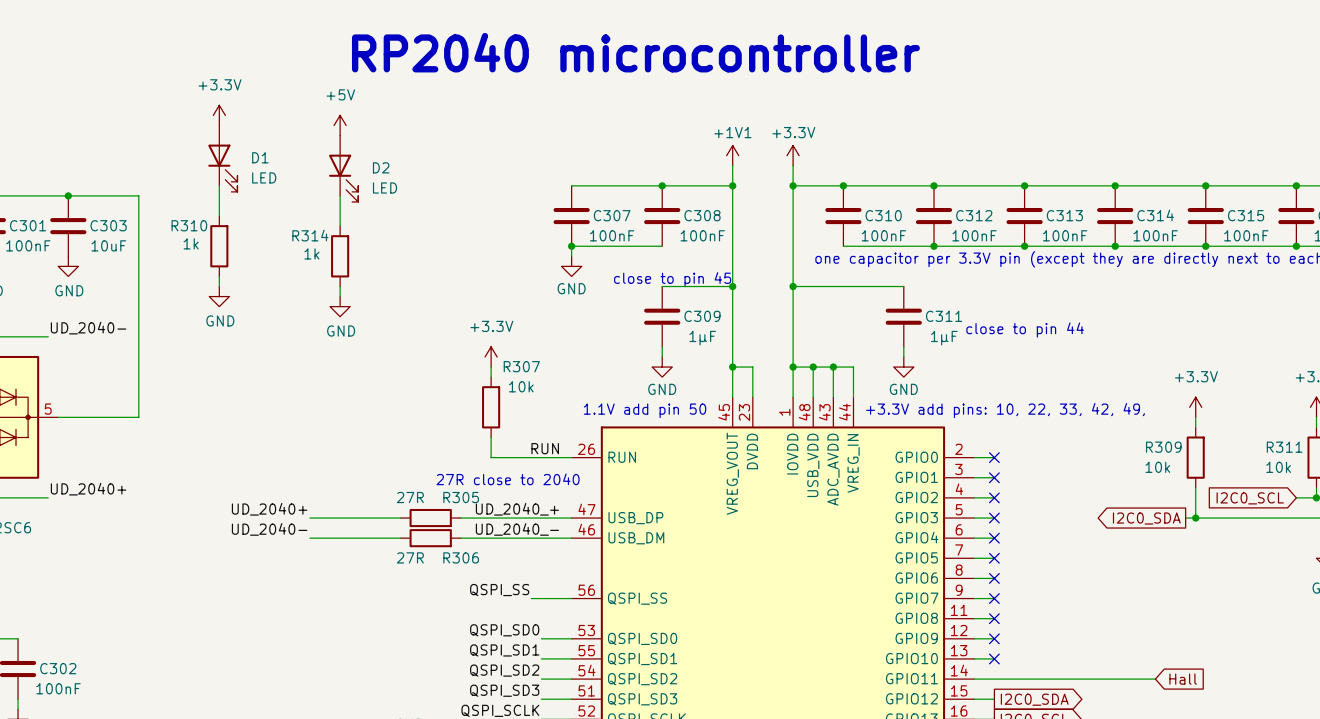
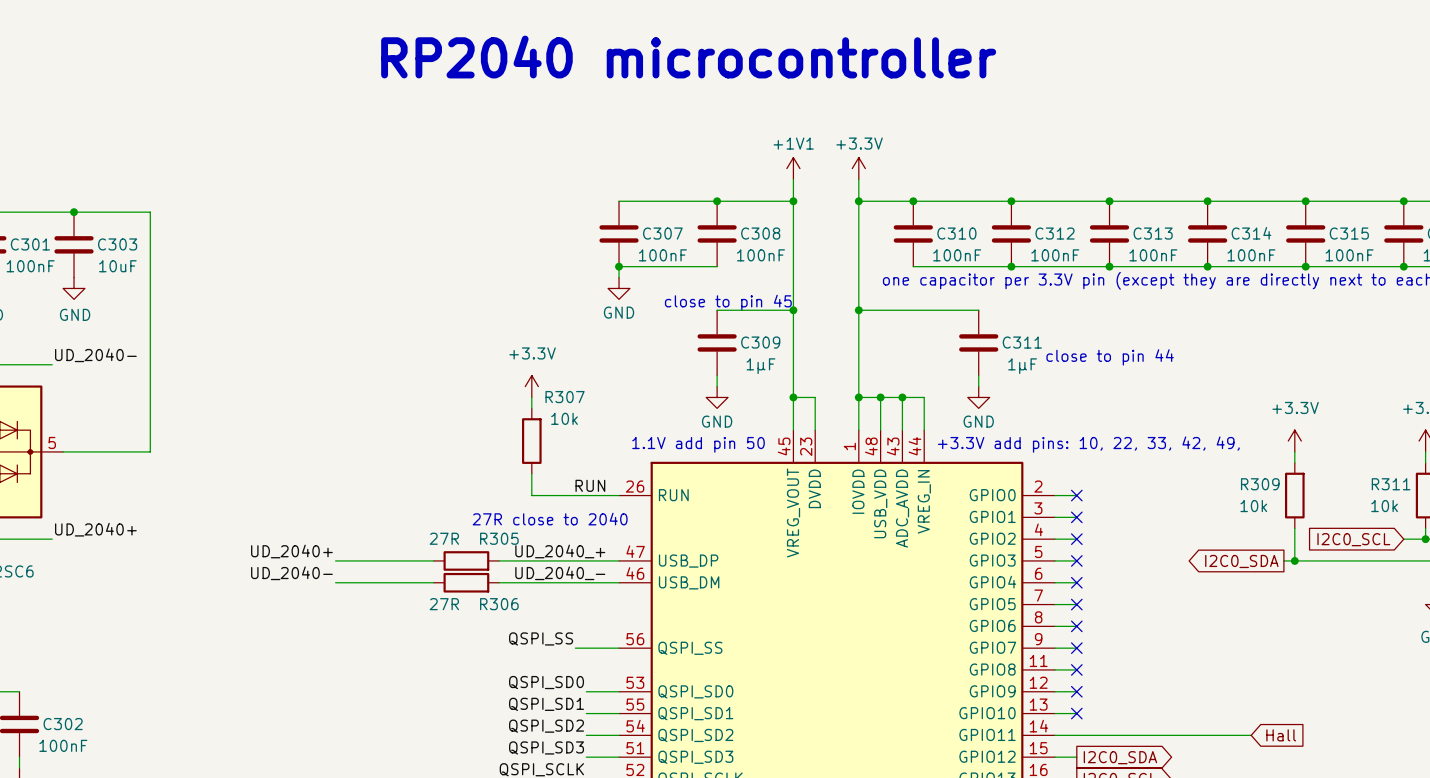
power symbol: +3.3V (219, 115) -> none
power symbol: +5V (340, 125) -> none
D1: LED (222, 158) -> none
D2: LED (343, 168) -> none
wire: (219, 185) (219, 216) -> none
wire: (340, 195) (340, 226) -> none
R310: 1k (219, 246) -> none
R314: 1k (340, 256) -> none
wire: (219, 276) (219, 286) -> none
wire: (340, 286) (340, 296) -> none
power symbol: GND (219, 296) -> none
power symbol: GND (340, 306) -> none

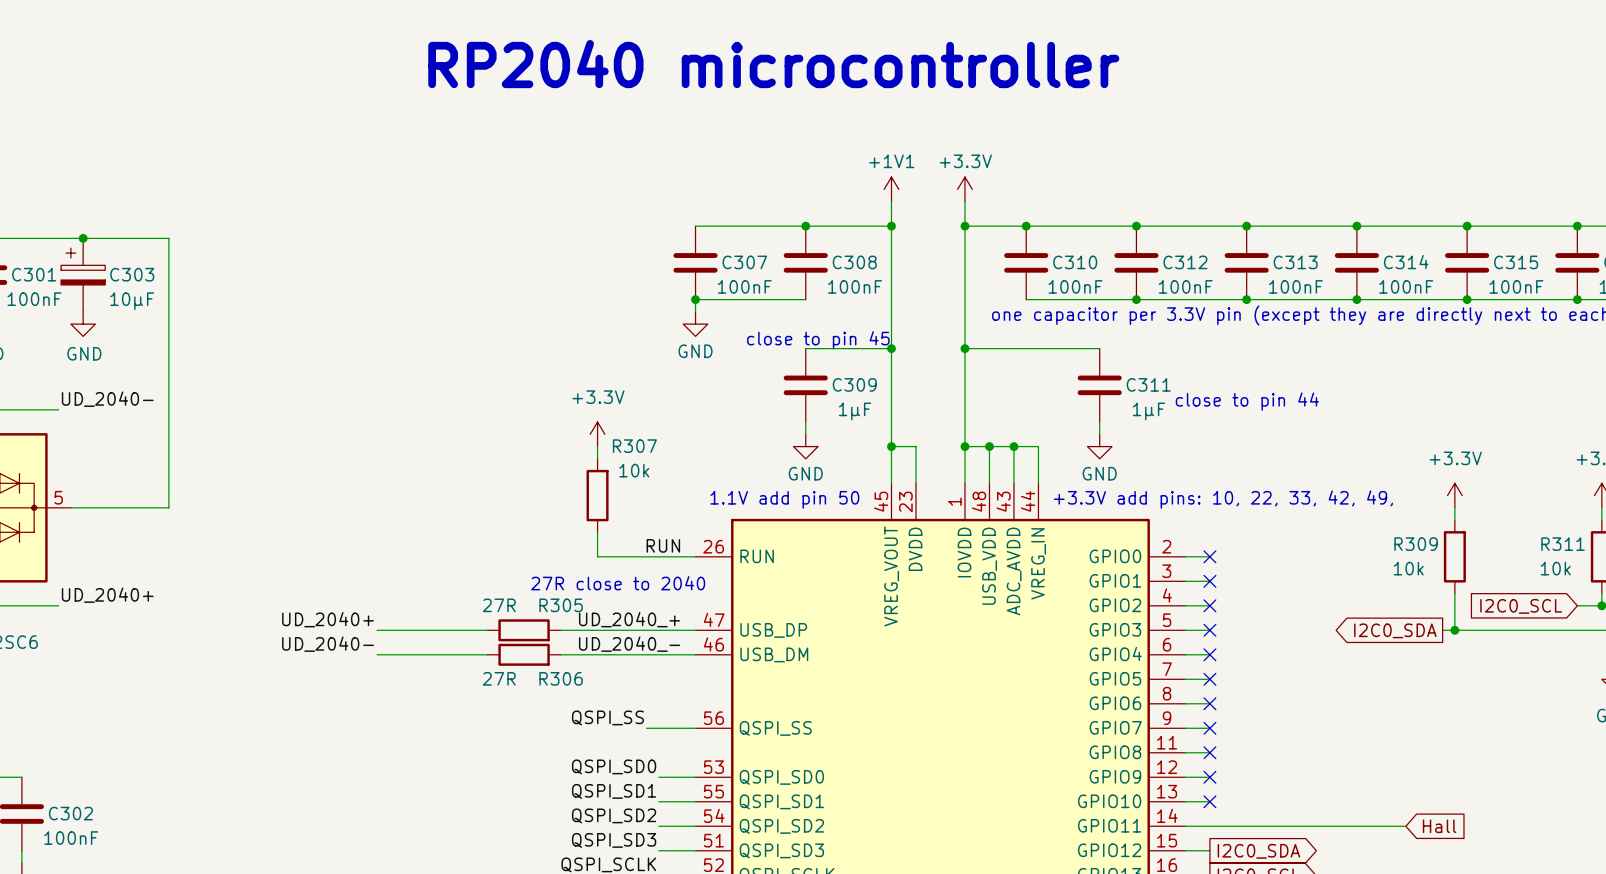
C303 symbol: [54, 212, 94, 278] -> [61, 238, 106, 312]
C303 value: 10uF (117, 266) -> 10µF (132, 301)

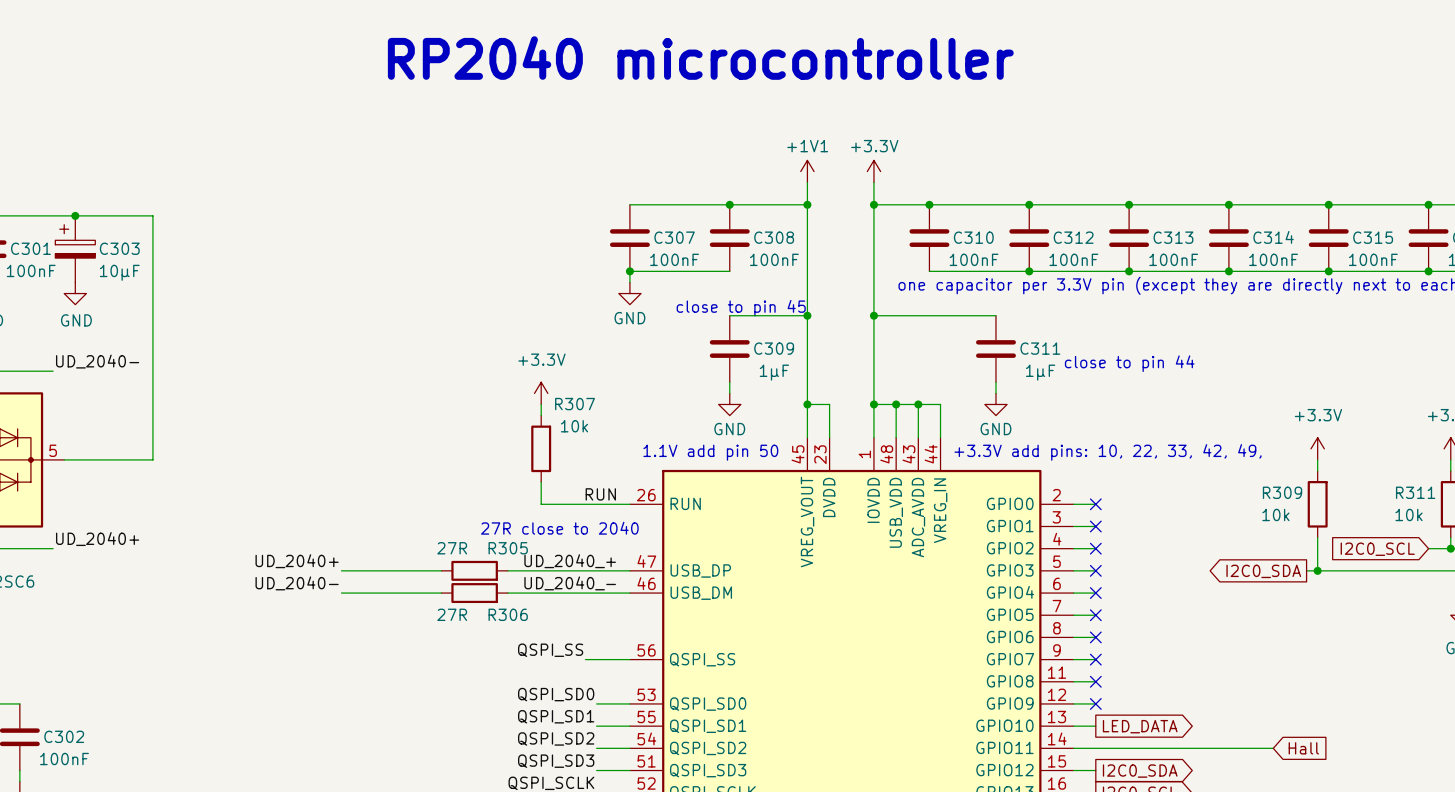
no-connect mark: (1209, 801) -> none
global label: none -> LED_DATA (1140, 726)

